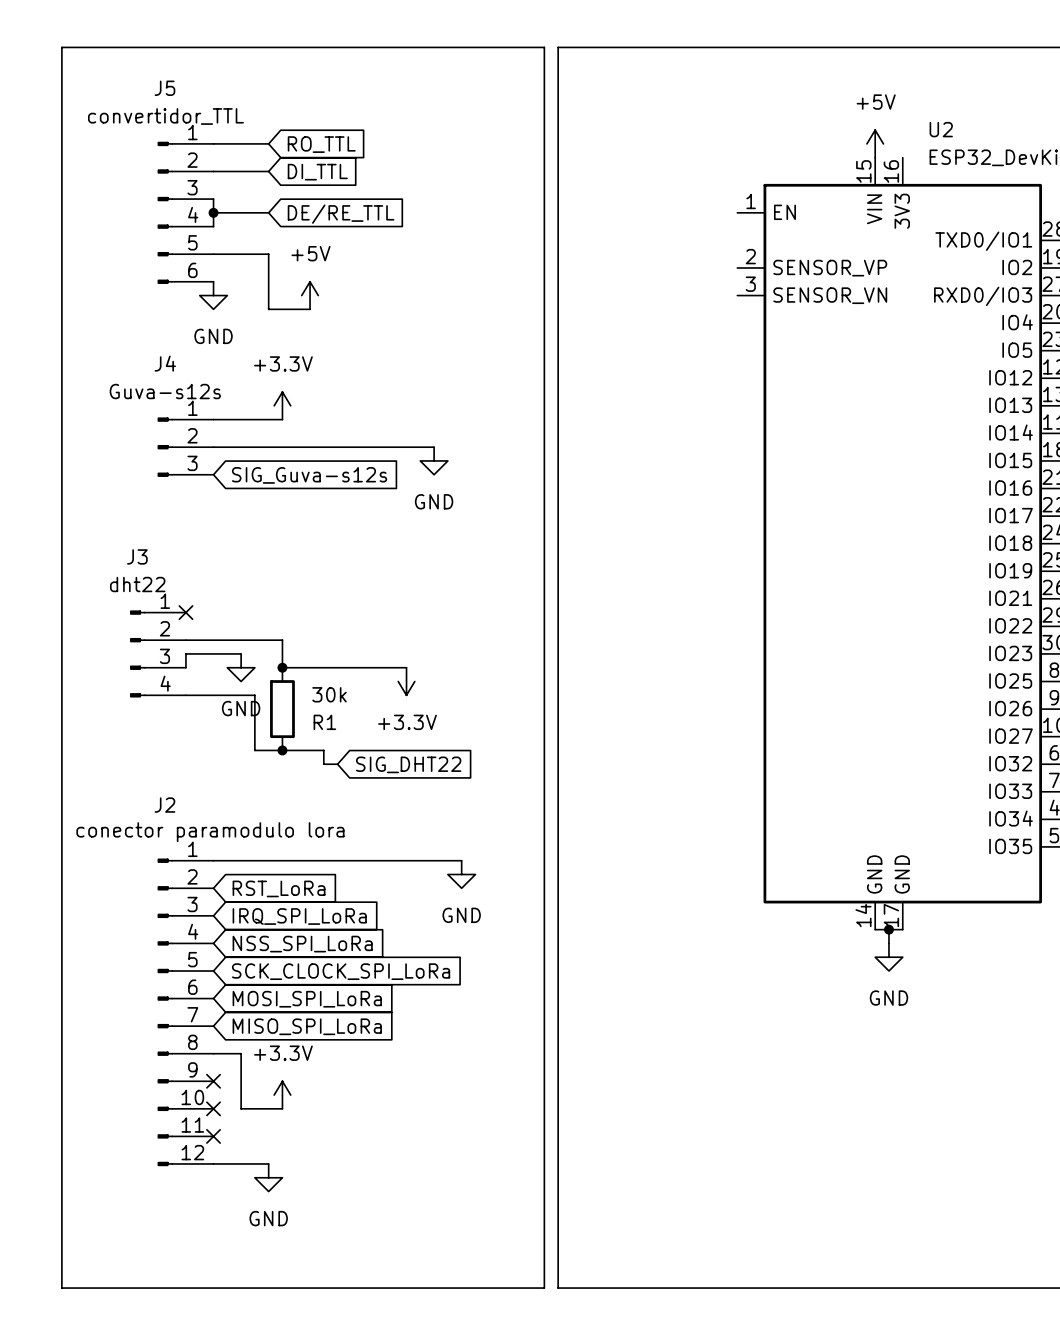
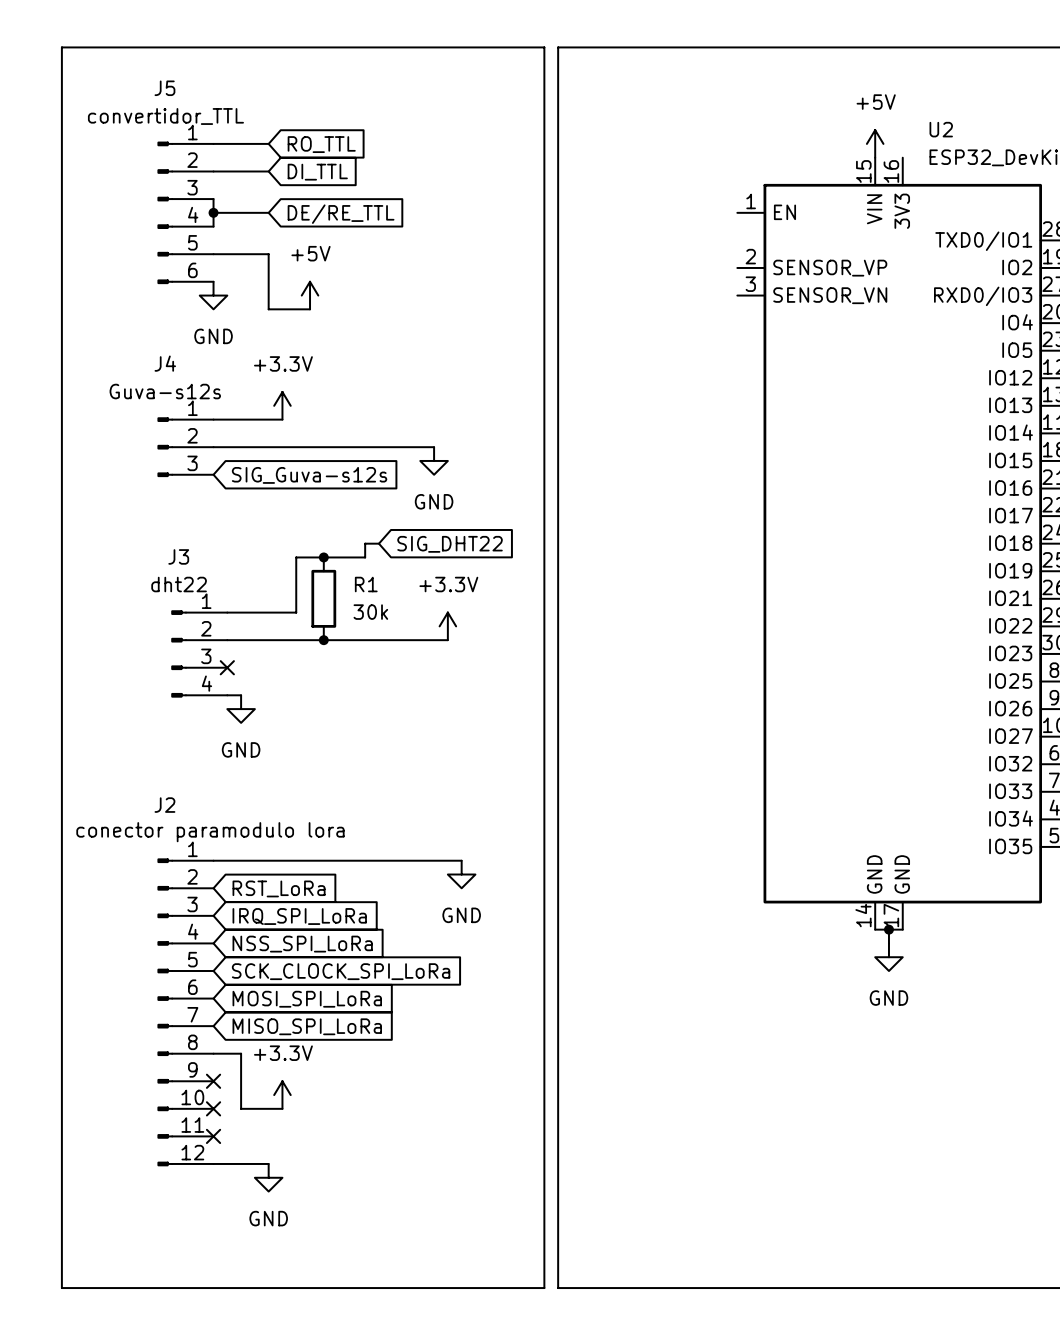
wire: none -> (378, 543) (365, 543) (365, 557) (296, 557) (296, 612) (227, 612)
junction: none -> (323, 557)
no-connect mark: (185, 612) -> none
wire: (282, 640) (282, 667) (406, 667) -> (282, 640) (447, 640)
J3 position: (157, 653) -> (199, 653)
wire: (241, 653) (185, 653) (185, 667) -> none
no-connect mark: none -> (227, 667)
power symbol position: GND (241, 667) -> GND (241, 709)
junction position: (282, 667) -> (323, 640)
power symbol rotation: 0° (406, 681) -> 180° (447, 626)
power symbol position: +3.3V (406, 681) -> +3.3V (447, 626)
R1 value position: 30k (329, 694) -> 30k (370, 612)
wire: (241, 695) (254, 695) (254, 750) (323, 750) (323, 764) (337, 764) -> none
R1 position: (282, 709) -> (323, 598)
R1 name position: R1 (324, 722) -> R1 (366, 584)
junction: (282, 750) -> none
global label position: SIG_DHT22 (408, 764) -> SIG_DHT22 (450, 544)

